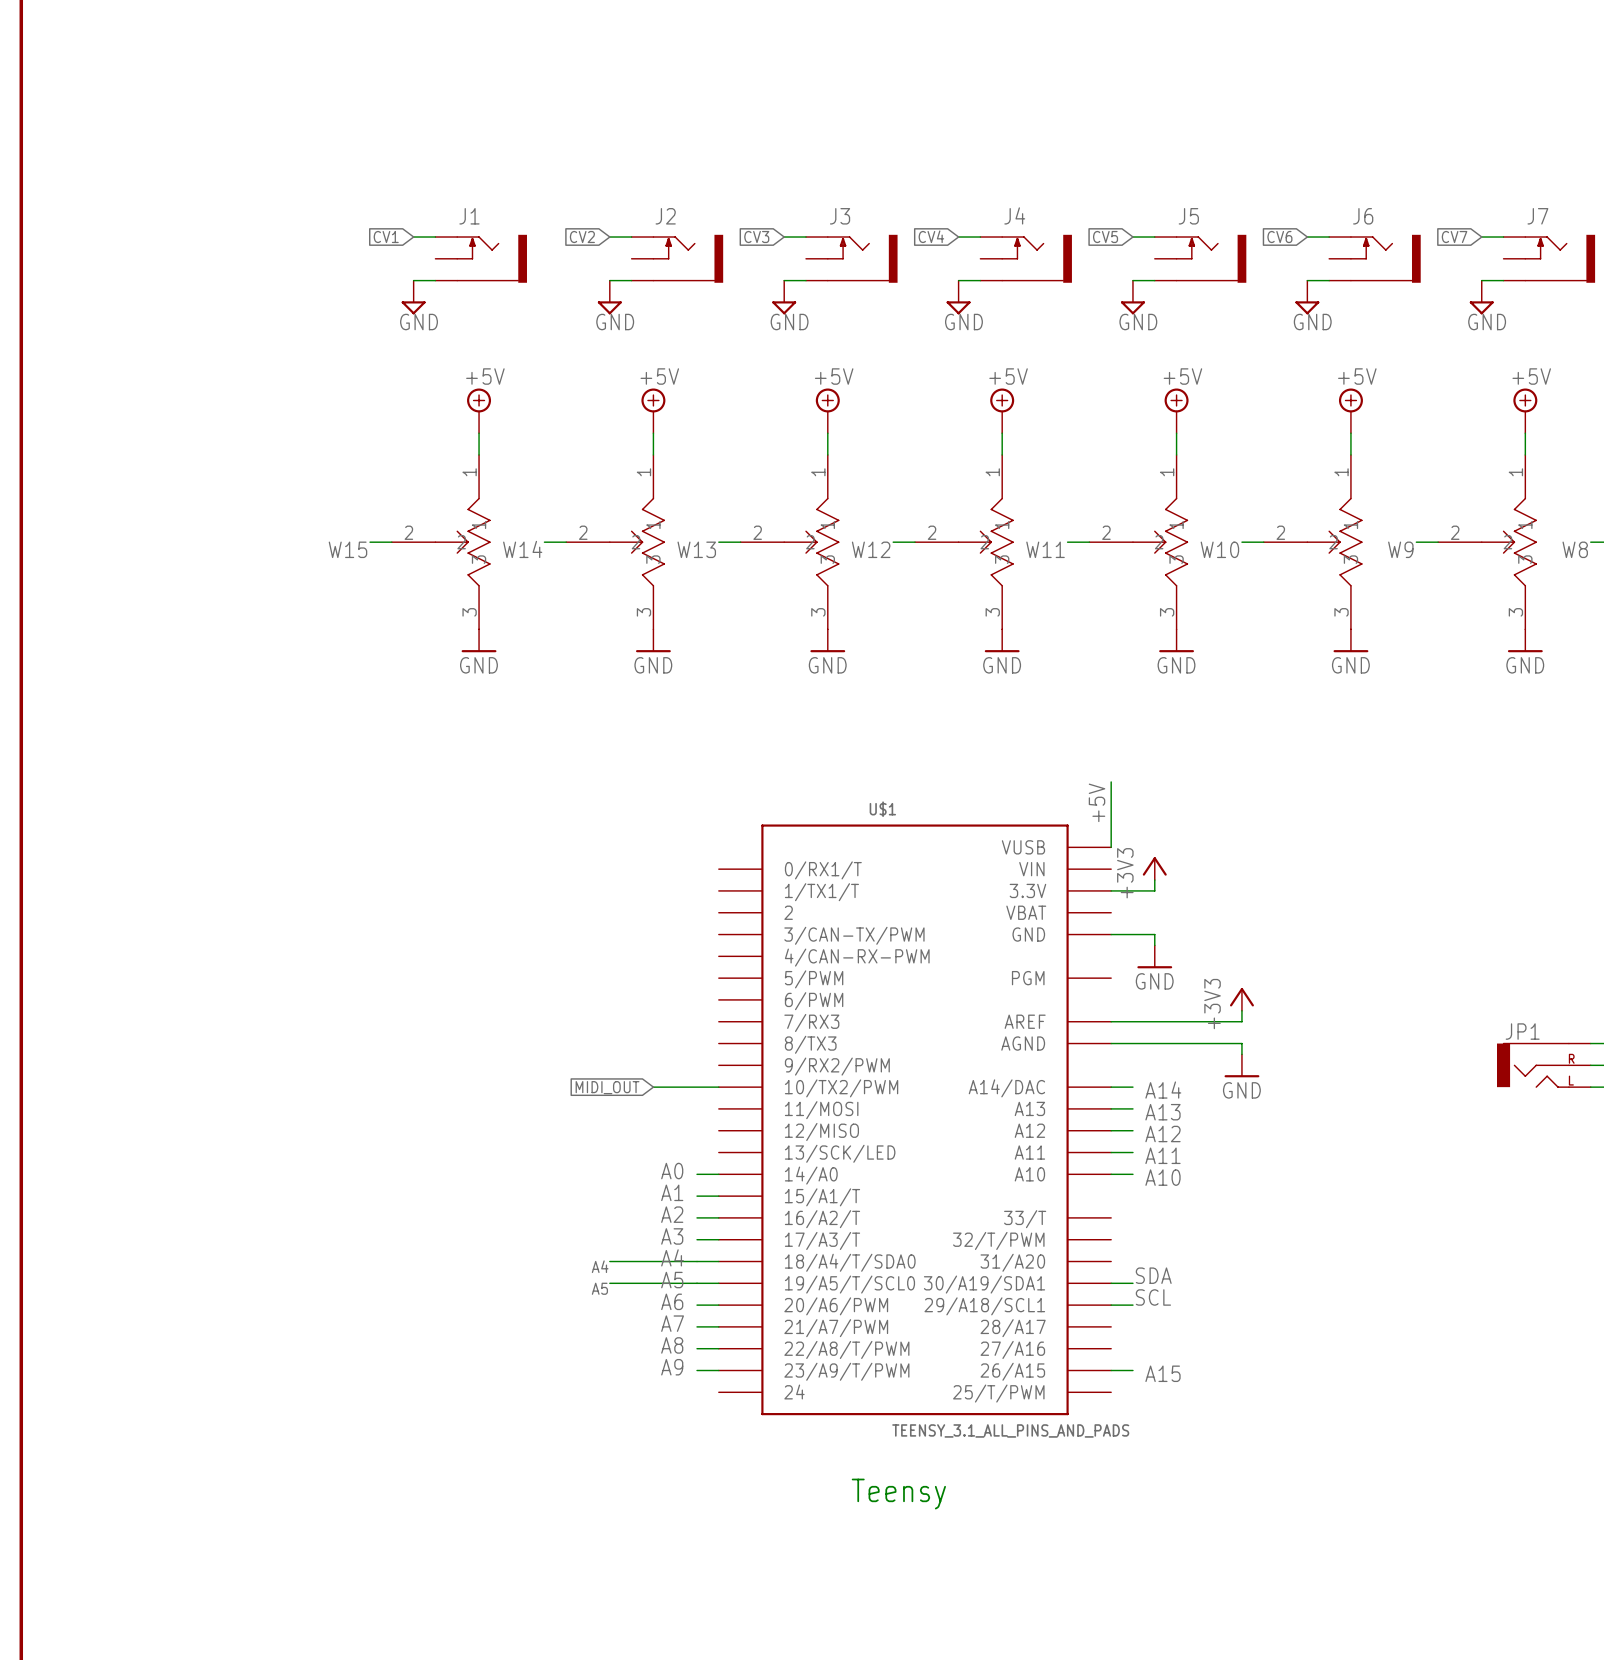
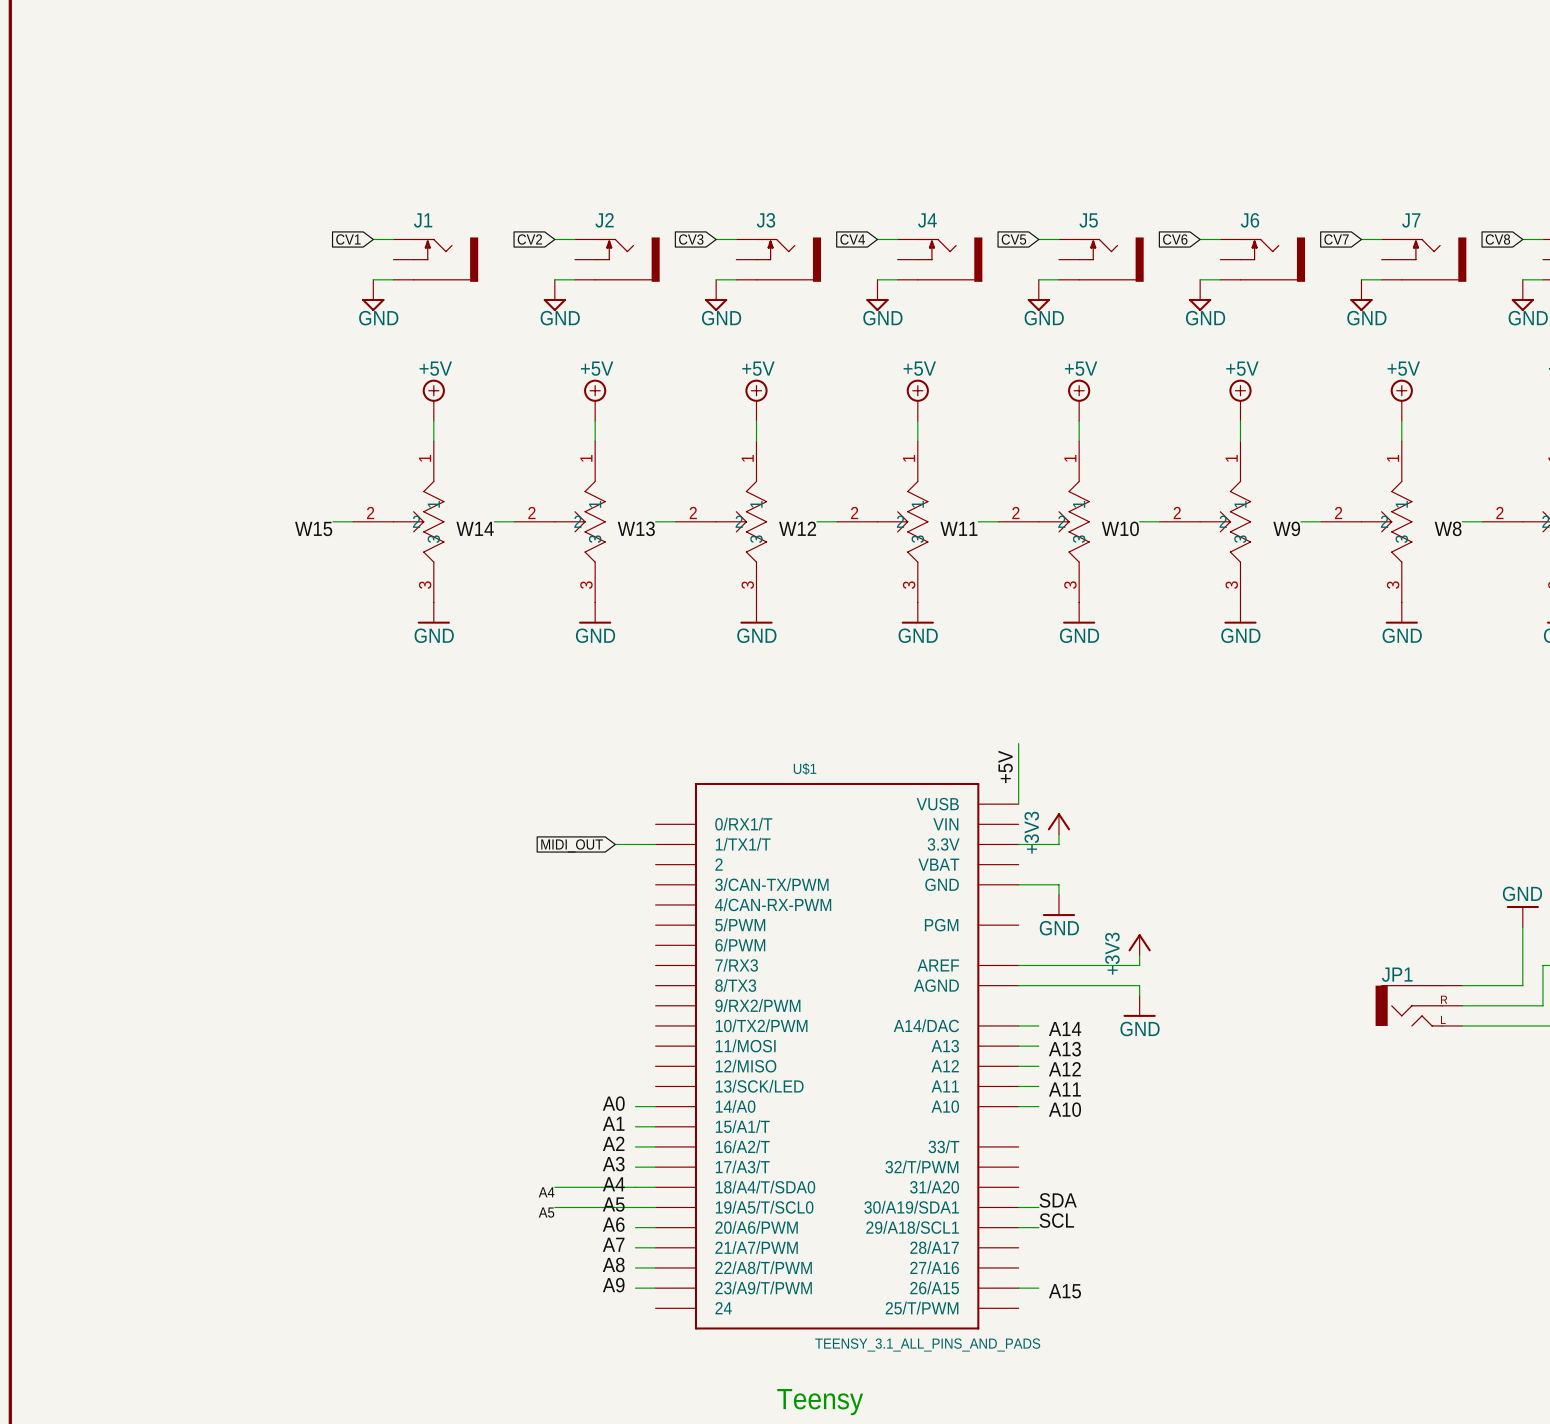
wire: none -> (615, 844) (655, 844)
global label position: MIDI_OUT (607, 1087) -> MIDI_OUT (572, 845)
wire: (653, 1087) (718, 1087) -> none

